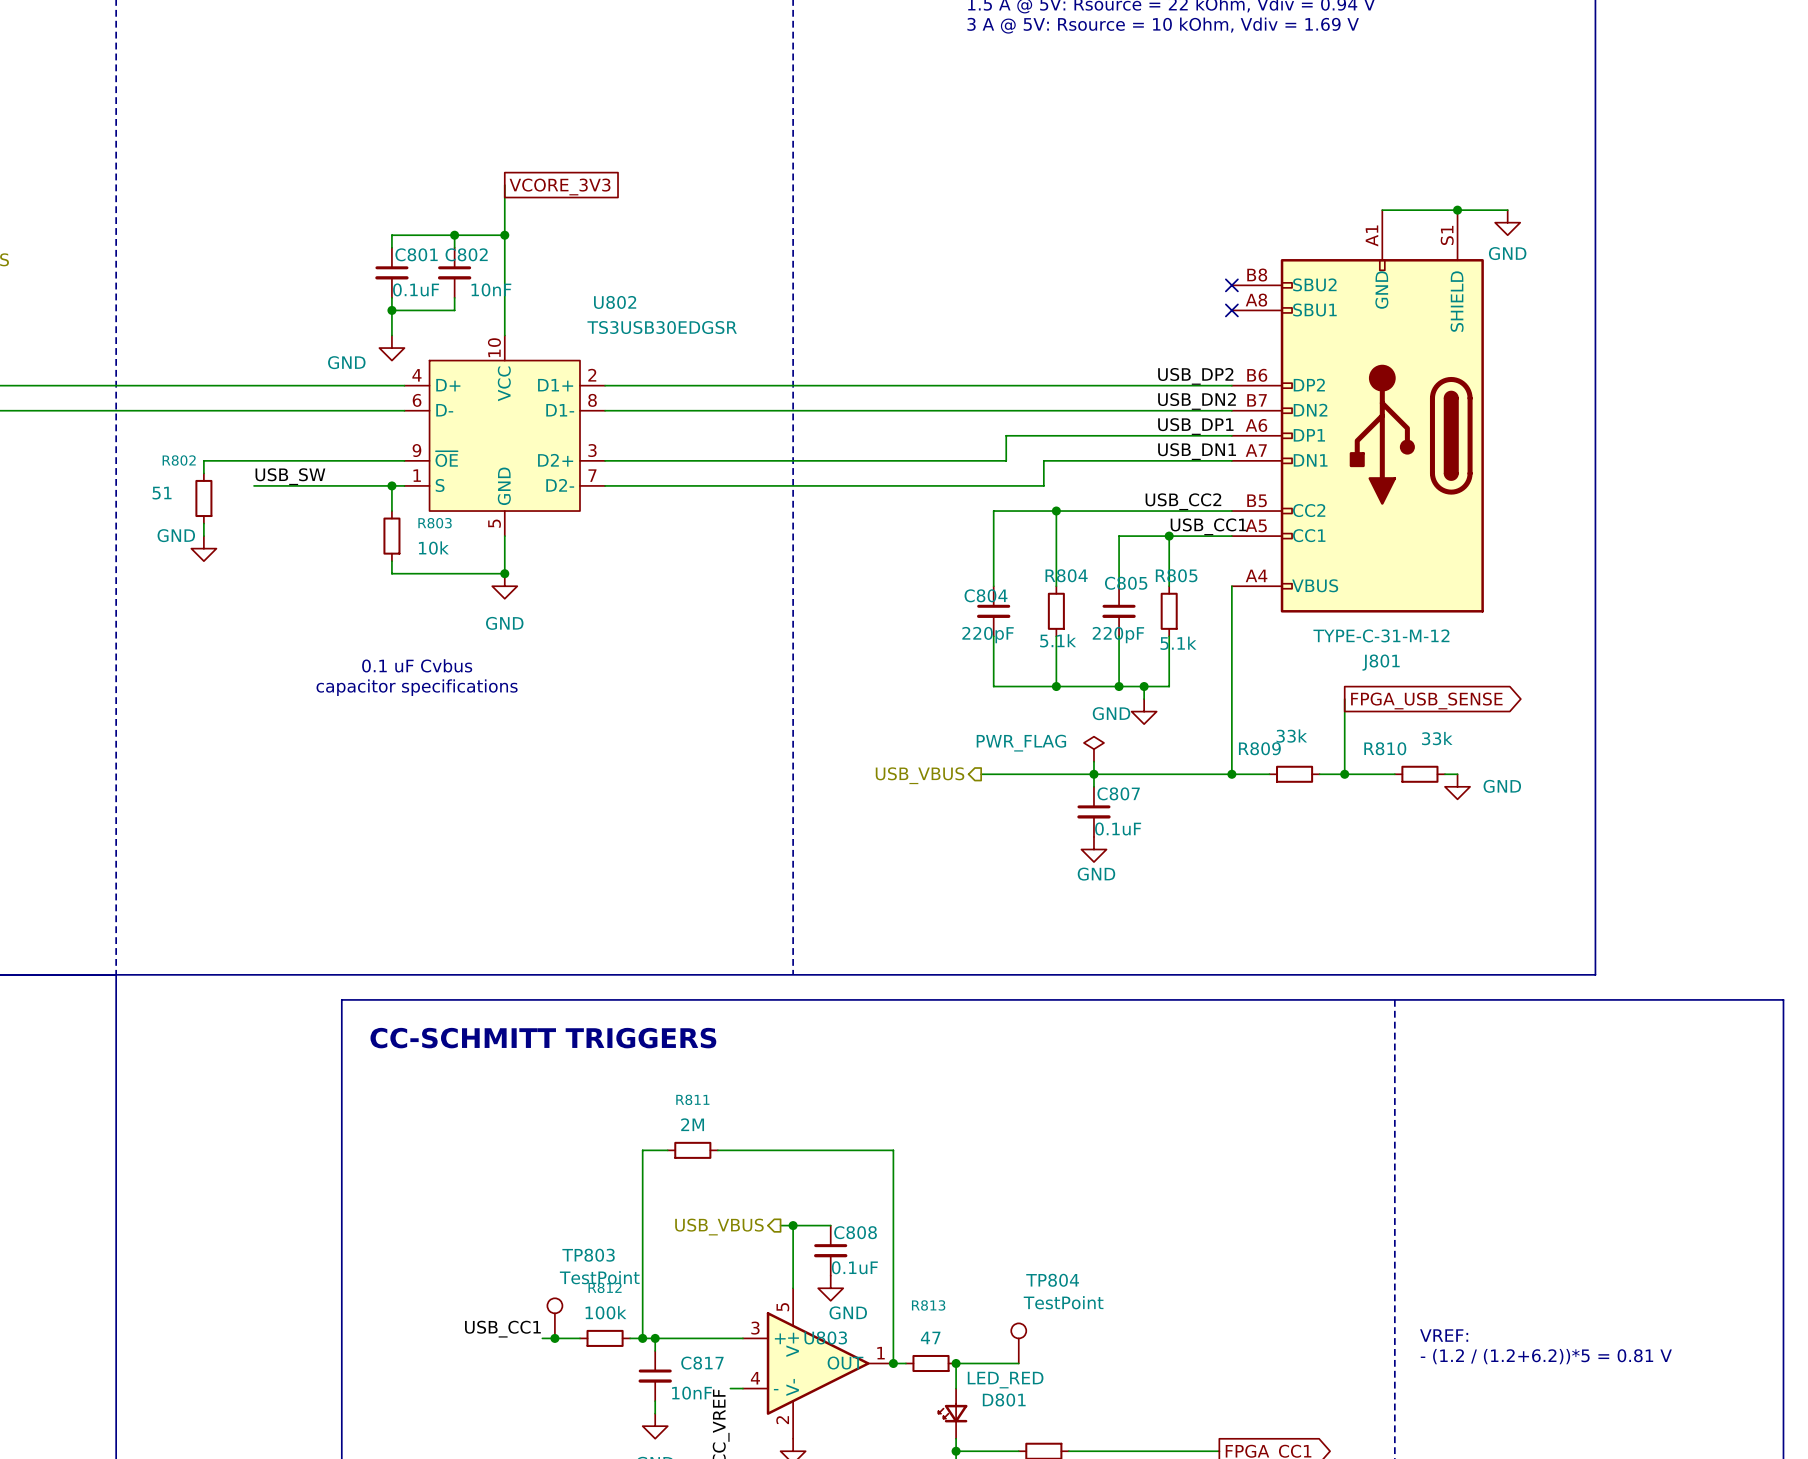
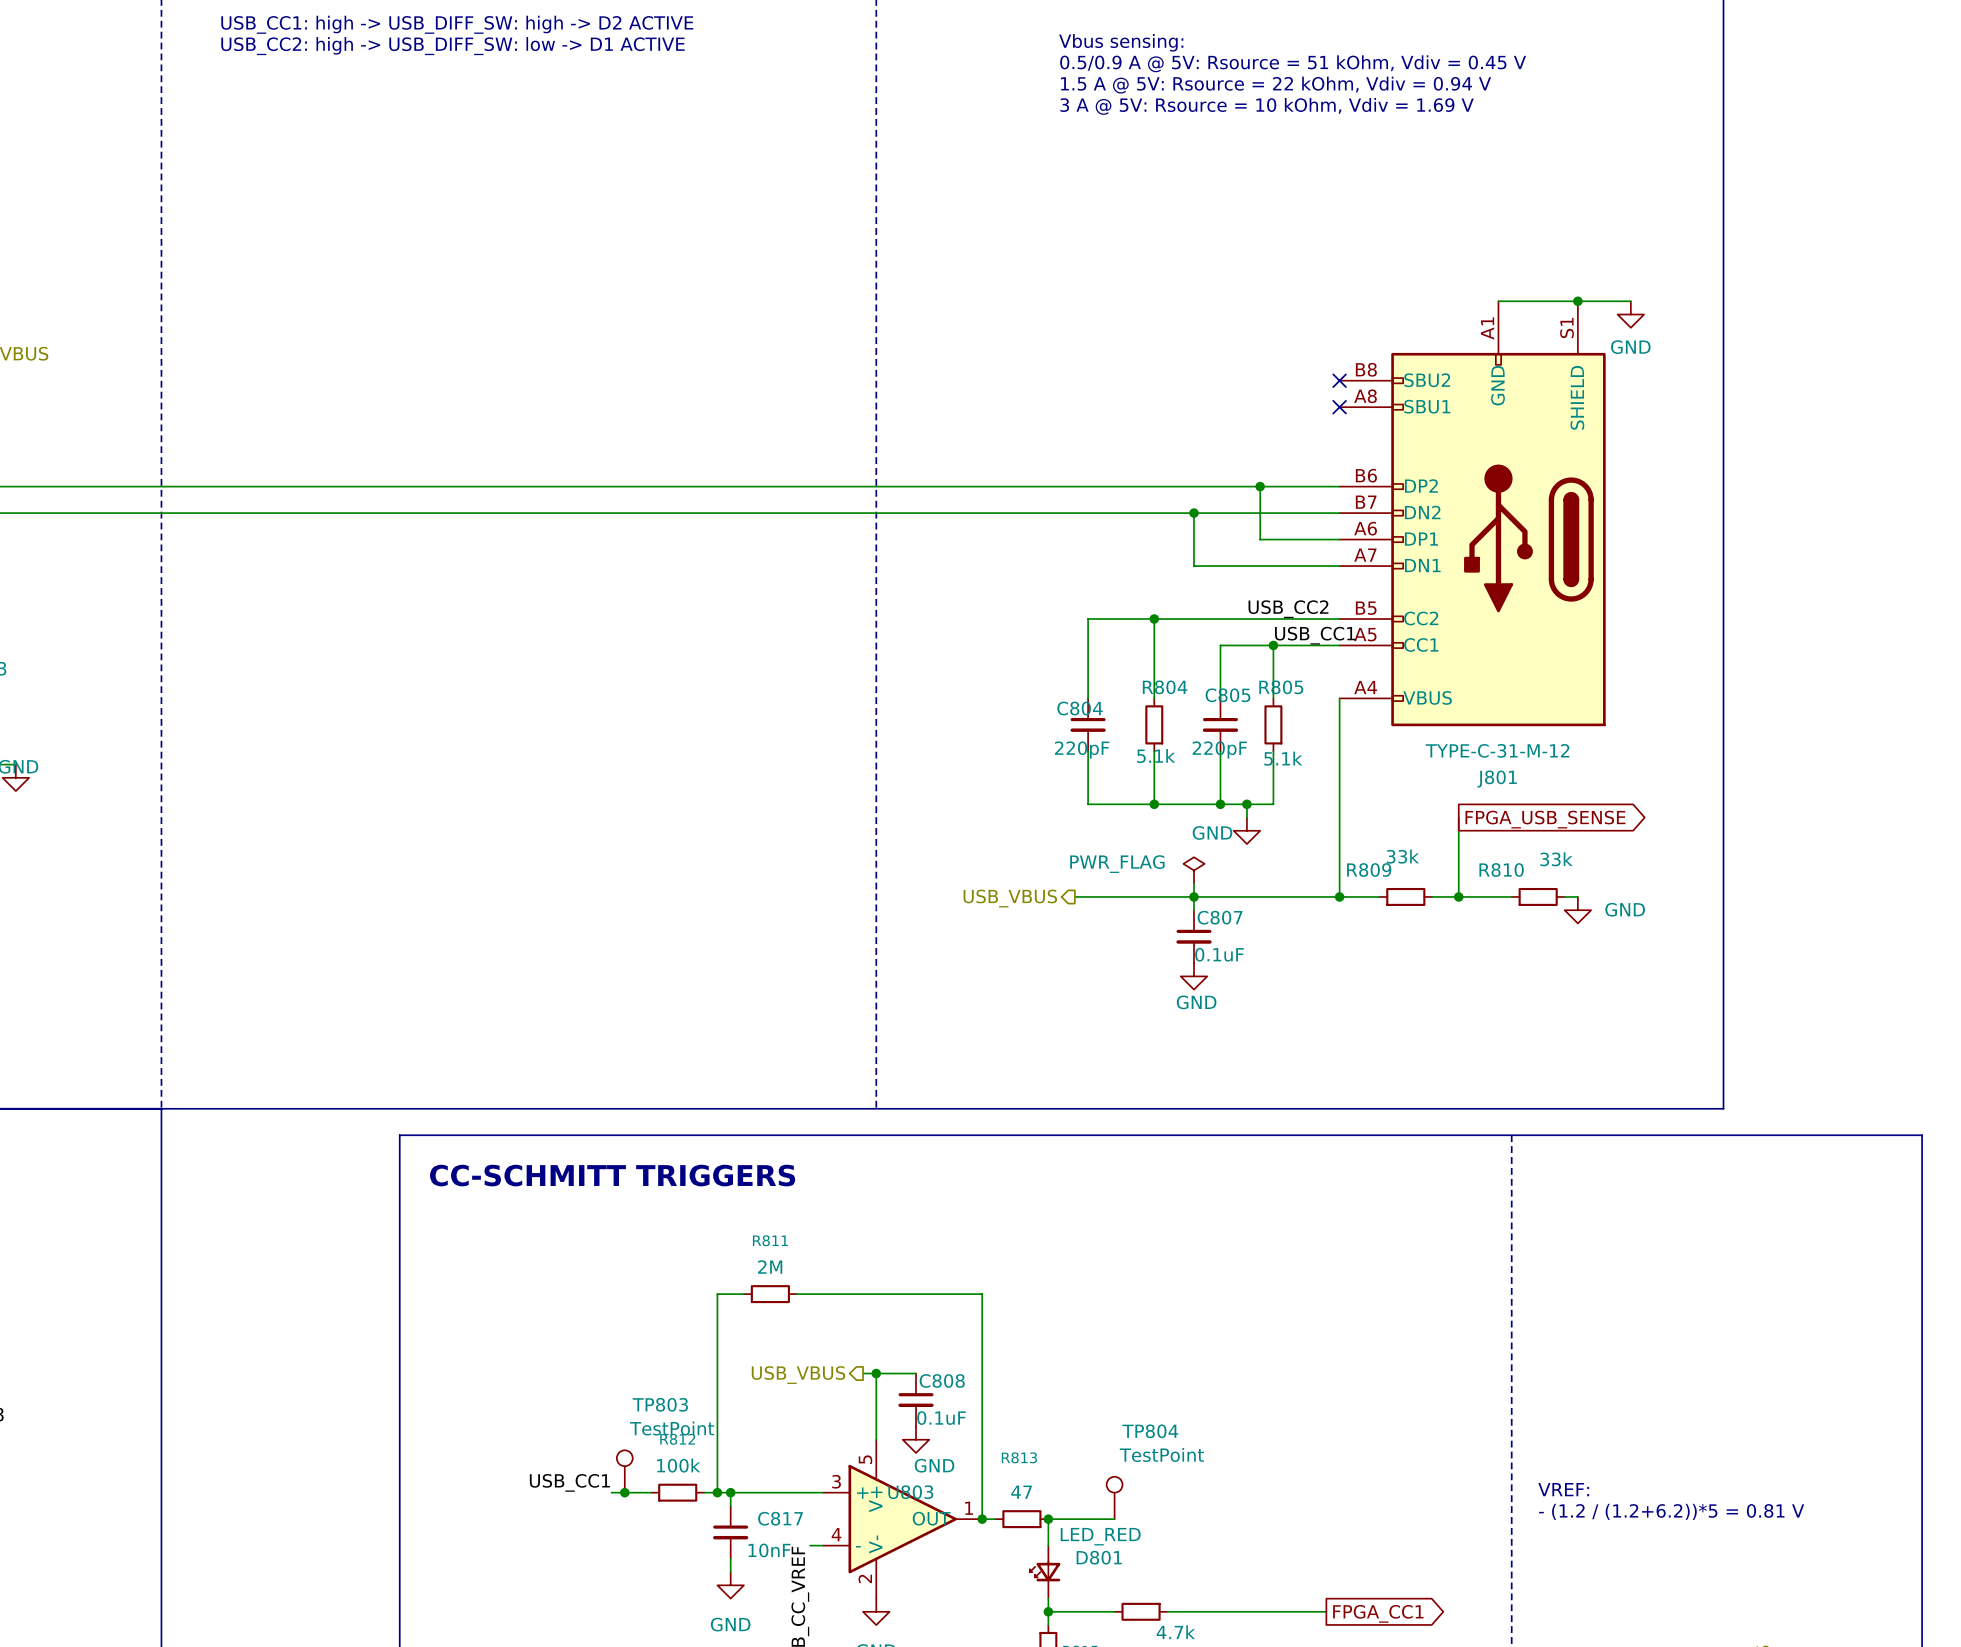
wire: (504, 185) (504, 335) -> none
global label: VCORE_3V3 (560, 186) -> none
wire: (454, 235) (454, 247) -> none
junction: (454, 235) -> none
wire: (504, 235) (391, 235) (391, 247) -> none
junction: (504, 235) -> none
C801: 0.1uF (391, 272) -> none
C802: 10nF (454, 272) -> none
wire: (391, 297) (391, 335) -> none
wire: (454, 297) (454, 310) (391, 310) -> none
junction: (391, 310) -> none
power symbol: GND (391, 348) -> none
label: USB_DP2 (1195, 376) -> none
junction: none -> (1260, 486)
label: USB_DN2 (1197, 401) -> none
junction: none -> (1194, 513)
label: USB_DP1 (1195, 426) -> none
U802: TS3USB30EDGSR (504, 435) -> none
wire: (1156, 435) (1006, 435) (1006, 460) (605, 460) -> (1260, 539) (1260, 486)
label: USB_DN1 (1197, 451) -> none
wire: (404, 460) (203, 460) (203, 473) -> none
wire: (1093, 460) (1043, 460) (1043, 485) (605, 485) -> (1194, 566) (1194, 513)
label: USB_SW (290, 476) -> none
wire: (254, 485) (404, 485) -> none
wire: (391, 485) (391, 511) -> none
junction: (391, 485) -> none
R802: 51 (203, 498) -> none
wire: (203, 523) (203, 536) -> none
R803: 10k (391, 536) -> none
wire: (504, 536) (504, 573) (391, 573) (391, 561) -> none
power symbol: GND (203, 548) -> none
junction: (504, 573) -> none
power symbol: GND (504, 586) -> none
text: 0.1 uF Cvbus (417, 665) -> none
text: capacitor specifications (417, 687) -> none

